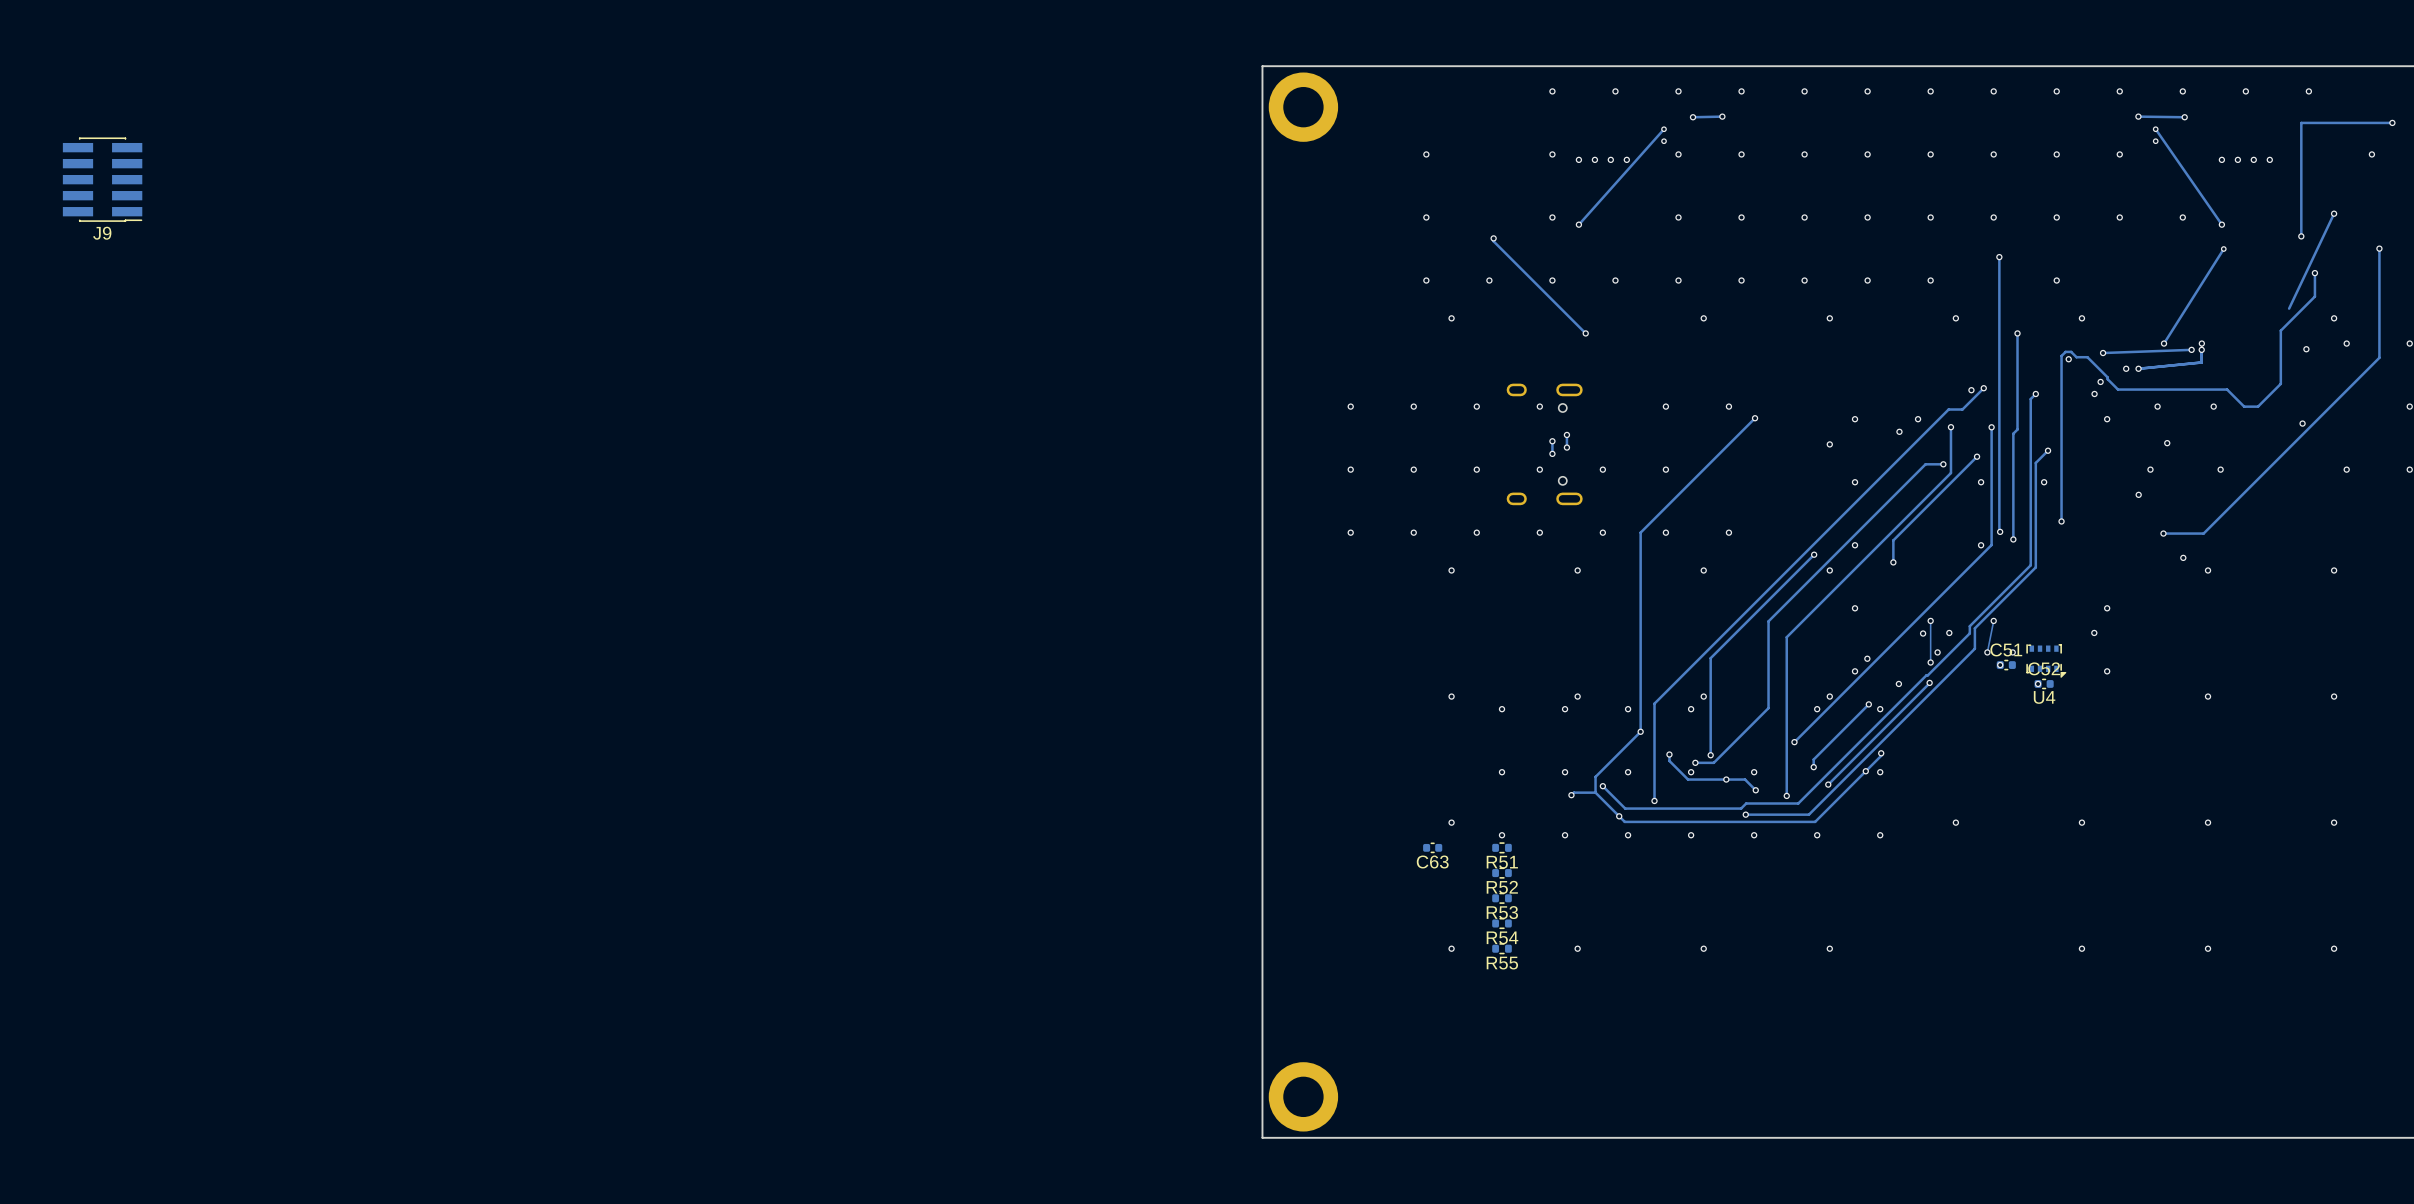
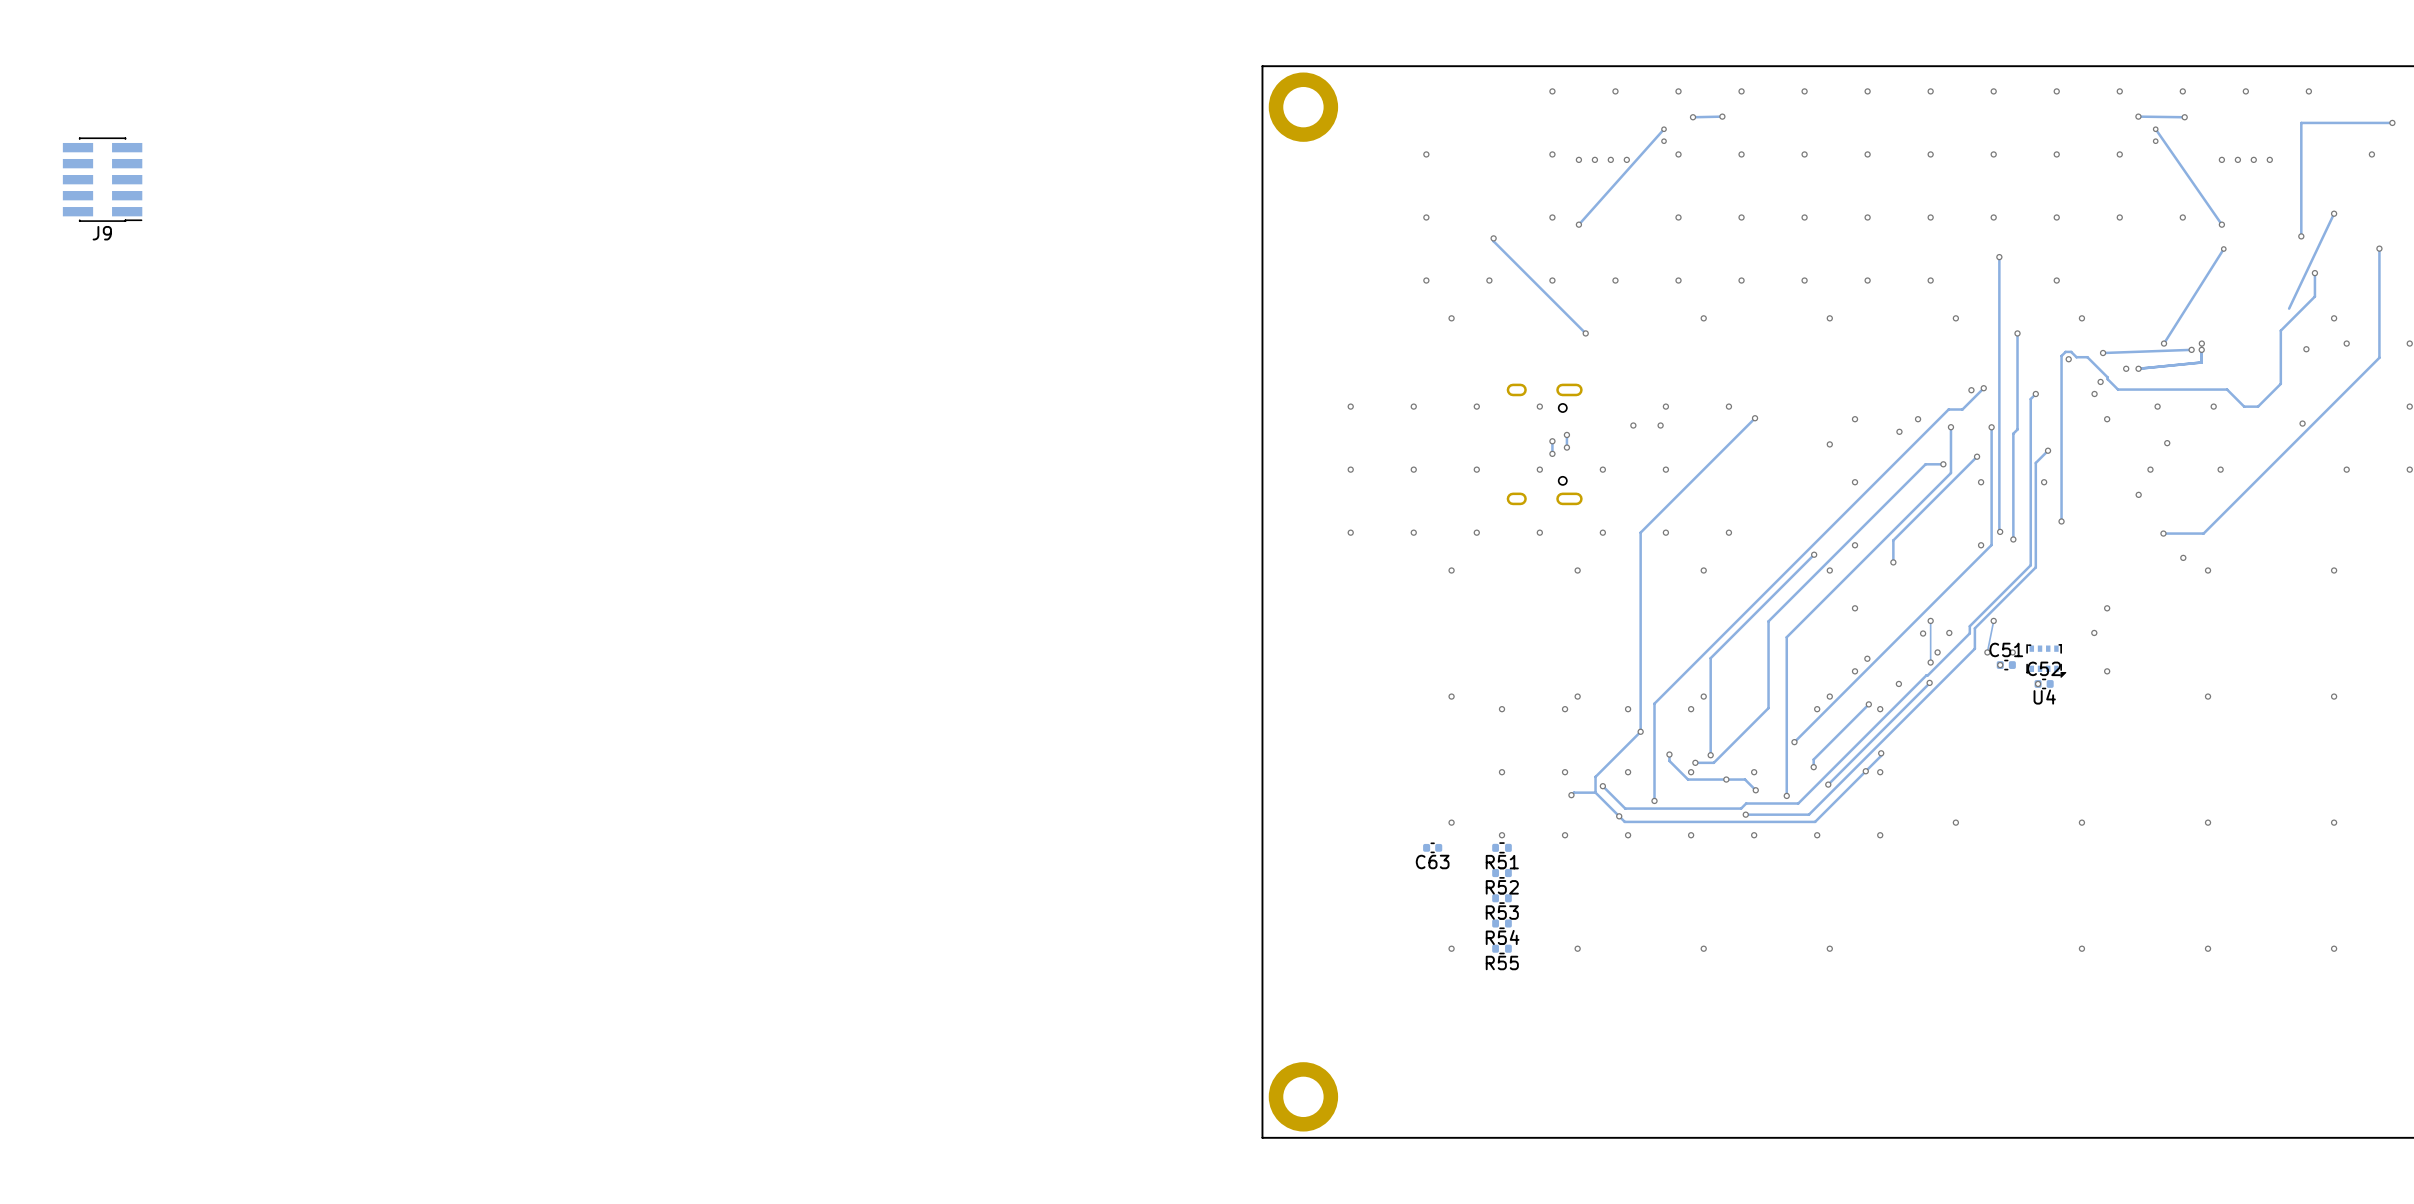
via: none -> (1633, 425)
via: none -> (1660, 425)

